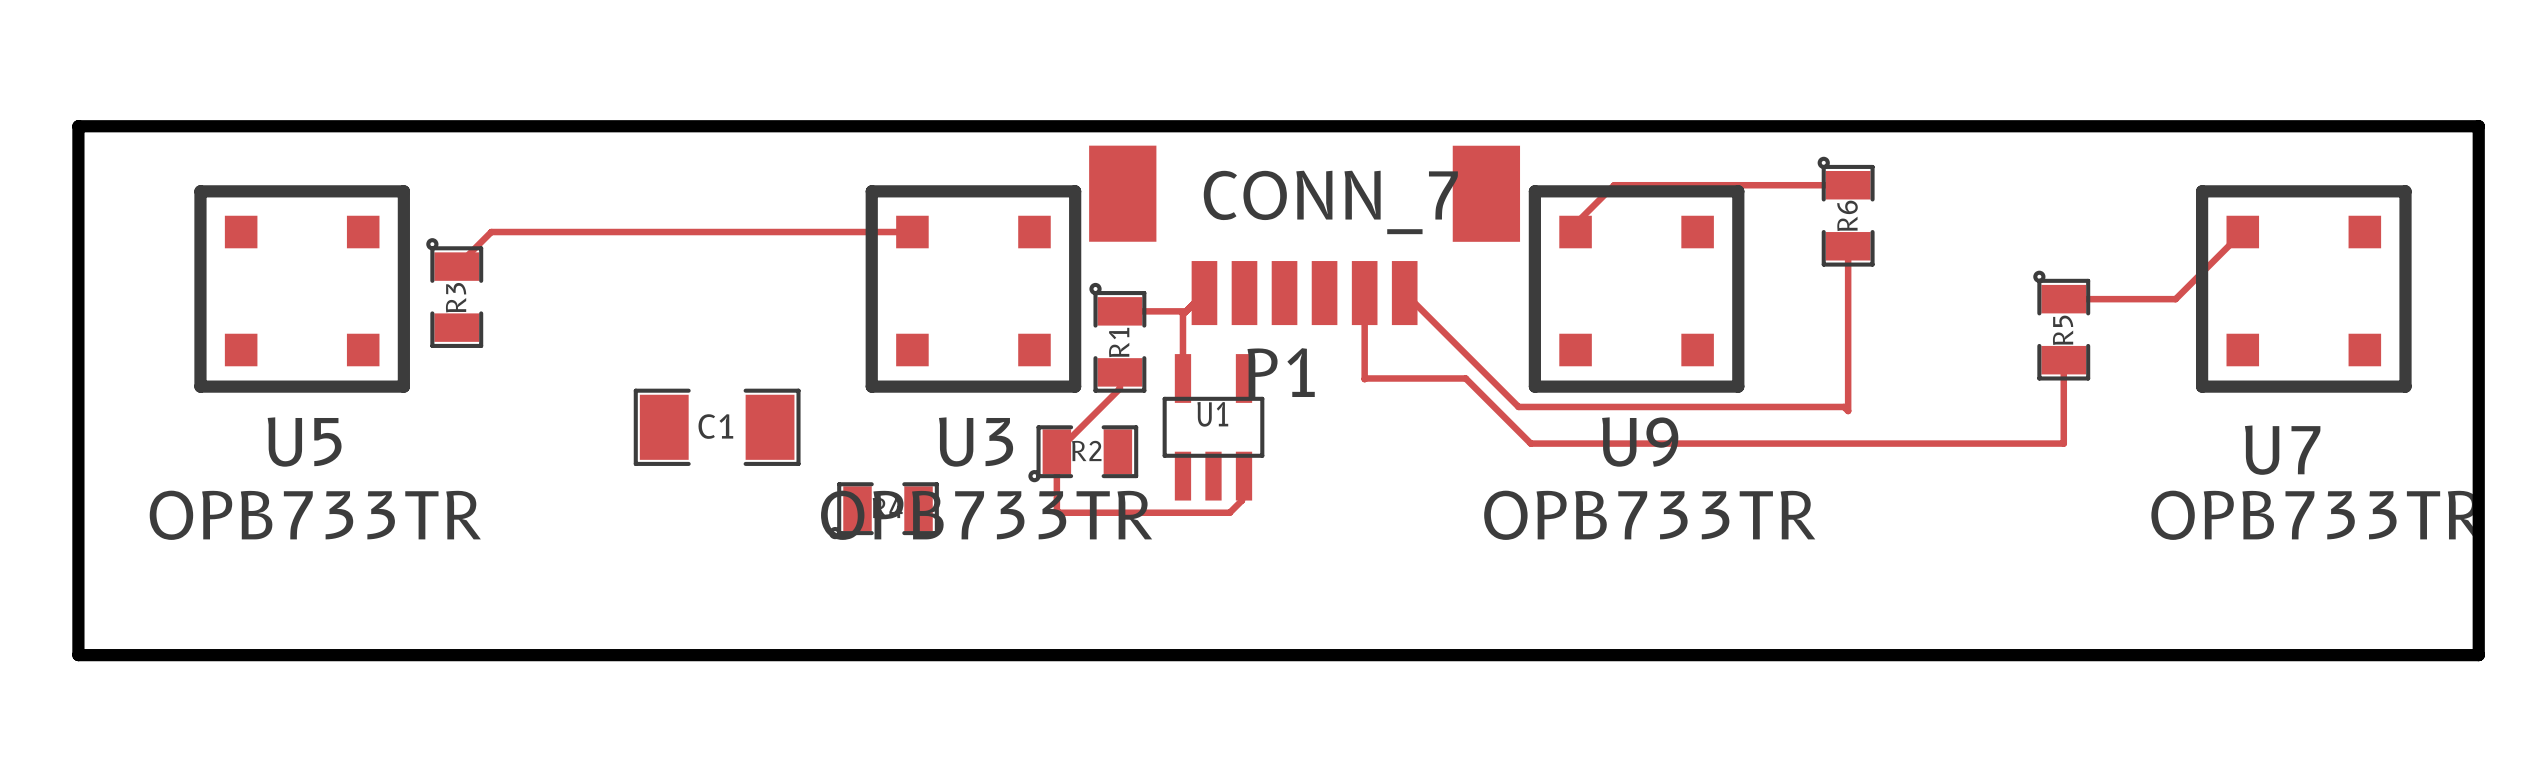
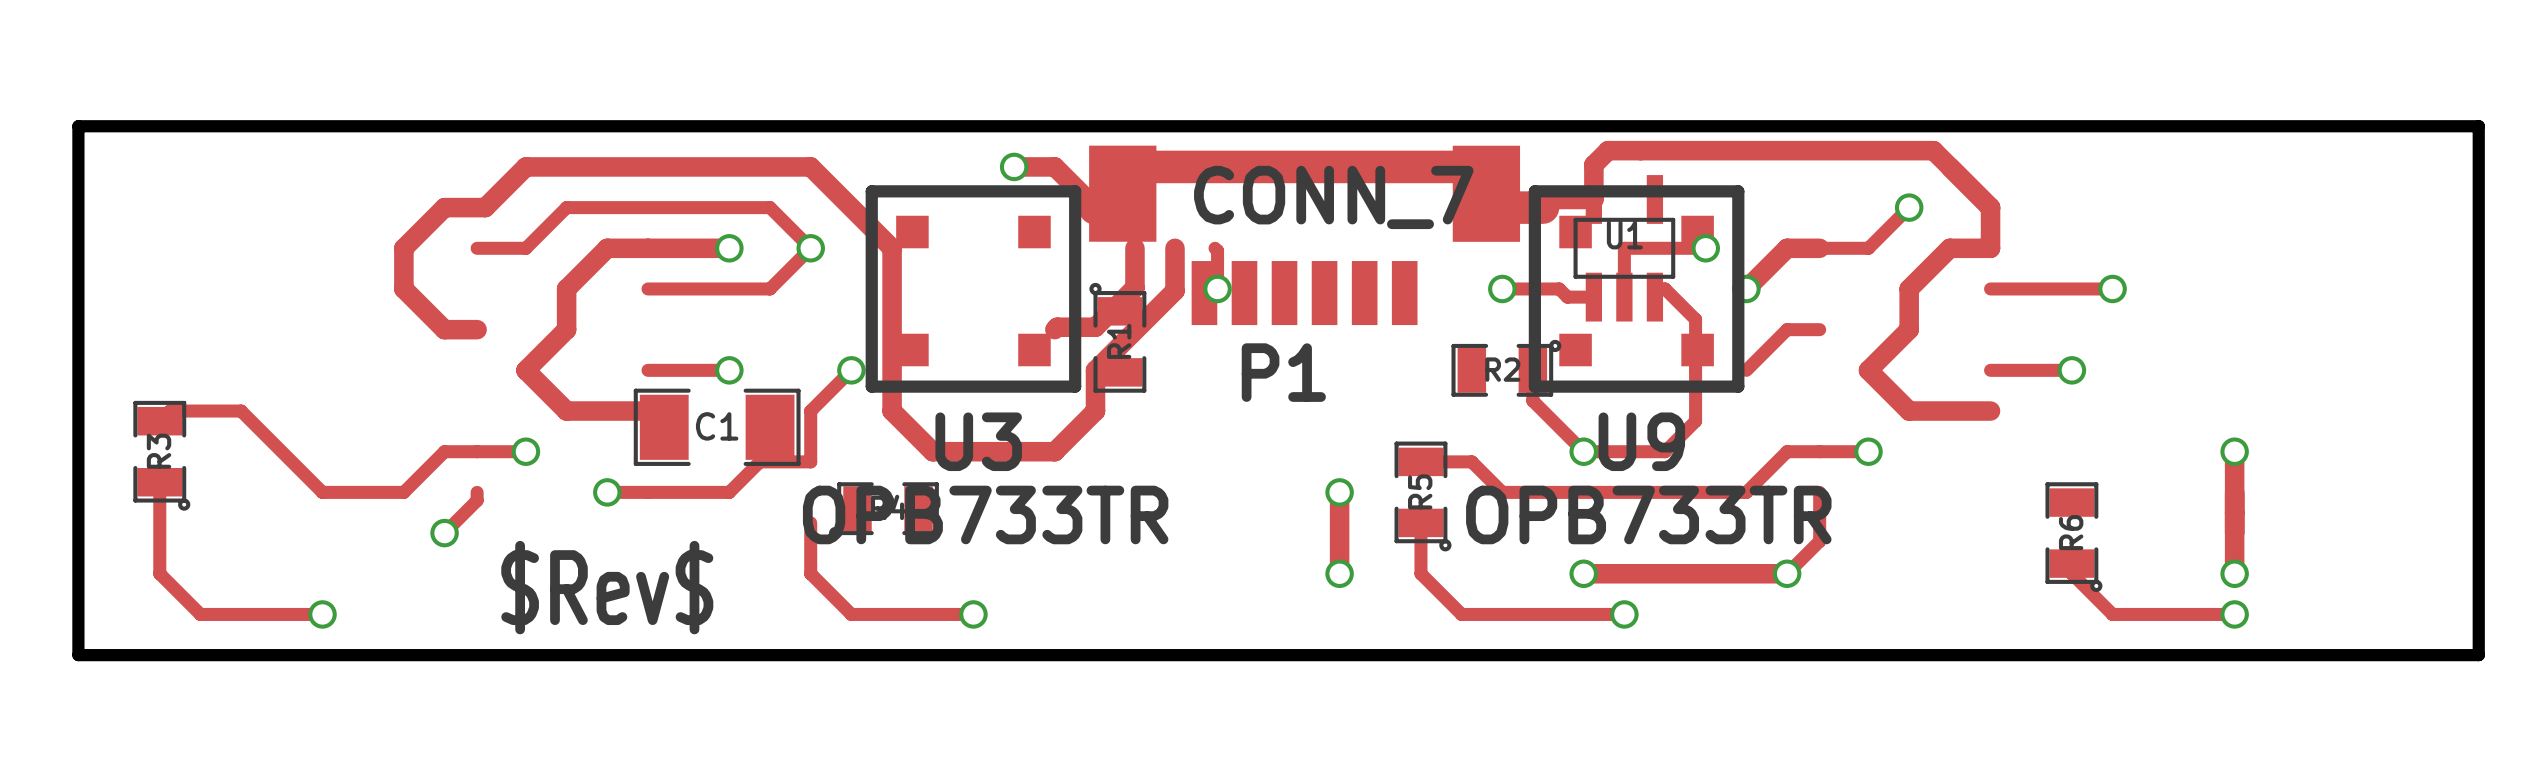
track: none -> (1014, 166) (1054, 166) (1094, 208) (1136, 166) (1461, 166) (1502, 207) (1543, 207) (1551, 199) (1593, 199) (1593, 164) (1608, 150) (1933, 150) (1990, 207) (1990, 248) (1949, 248) (1909, 288) (1909, 329) (1868, 370) (1909, 411) (1990, 411)
via: none -> (1014, 166)
track: (1848, 185) (1614, 185) (1575, 223) (1575, 232) -> none
track: none -> (1909, 207) (1868, 248) (1787, 248) (1746, 288)
via: none -> (1909, 207)
R6 rotation: 0° (1846, 211) -> 180° (2073, 537)
R6 position: (1846, 211) -> (2073, 537)
track: (912, 232) (491, 232) (456, 266) -> none
track: (2242, 232) (2175, 299) (2063, 299) -> none
track: (1848, 246) (1848, 411) (1844, 406) (1518, 406) (1404, 293) -> none
track: none -> (477, 248) (525, 248) (566, 207) (770, 207) (810, 248) (770, 288) (647, 288)
track: none -> (729, 248) (607, 248) (566, 288) (566, 329) (525, 370) (566, 411) (647, 411)
via: none -> (729, 248)
via: none -> (810, 248)
track: none -> (1134, 248) (1134, 287) (1095, 327) (1057, 327) (1054, 329)
track: none -> (1175, 248) (1175, 290) (1095, 370) (1095, 411) (1054, 451) (932, 451) (892, 411) (892, 248) (810, 166) (525, 166) (485, 207) (444, 207) (403, 248) (403, 288) (444, 329) (477, 329)
track: none -> (1215, 248) (1217, 250) (1217, 288)
track: none -> (1705, 248) (1624, 248) (1624, 297)
via: none -> (1705, 248)
U5: OPB733TR (302, 288) -> none
via: none -> (1217, 288)
track: none -> (1502, 288) (1559, 288) (1567, 297) (1593, 297) (1593, 288)
via: none -> (1502, 288)
via: none -> (1746, 288)
track: none -> (1990, 288) (2112, 288)
via: none -> (2112, 288)
U7: OPB733TR (2303, 288) -> none
R3 rotation: 0° (454, 293) -> 180° (161, 455)
R3 position: (454, 293) -> (161, 455)
track: (1204, 293) (1182, 314) (1182, 378) -> none
track: (1364, 293) (1364, 379) (1465, 378) (1530, 443) (2063, 443) (2063, 360) -> none
track: none -> (1654, 297) (1654, 288) (1665, 288) (1695, 319) (1695, 421) (1665, 451) (1583, 451) (1532, 400) (1532, 370)
track: (1119, 311) (1186, 311) -> none
R5 rotation: 0° (2061, 325) -> 180° (1423, 496)
R5 position: (2061, 325) -> (1423, 496)
track: none -> (1819, 329) (1787, 329) (1746, 370)
track: none -> (647, 370) (729, 370)
via: none -> (729, 370)
track: none -> (851, 370) (810, 411) (810, 461) (759, 461) (729, 492) (607, 492)
via: none -> (851, 370)
track: none -> (1990, 370) (2071, 370)
via: none -> (2071, 370)
track: (1119, 372) (1119, 388) (1056, 451) (1056, 510) (1058, 512) (1229, 512) (1241, 500) (1244, 476) -> none
track: none -> (159, 421) (169, 411) (241, 411) (322, 492) (403, 492) (444, 451) (525, 451)
U1 position: (1213, 427) -> (1624, 248)
via: none -> (525, 451)
via: none -> (1583, 451)
track: none -> (1868, 451) (1787, 451) (1746, 492) (1502, 492) (1471, 461) (1420, 461)
via: none -> (1868, 451)
track: none -> (2234, 451) (2234, 573)
via: none -> (2234, 451)
R2 rotation: 0° (1083, 453) -> 180° (1506, 368)
R2 position: (1083, 453) -> (1506, 368)
track: none -> (159, 482) (159, 573) (200, 614) (322, 614)
track: none -> (477, 492) (477, 500) (444, 533)
via: none -> (607, 492)
track: none -> (1339, 492) (1339, 573)
via: none -> (1339, 492)
track: none -> (1819, 492) (1819, 541) (1787, 573) (1583, 573)
track: none -> (810, 522) (810, 573) (851, 614) (973, 614)
track: none -> (1420, 522) (1420, 573) (1461, 614) (1624, 614)
via: none -> (444, 533)
track: none -> (2071, 563) (2071, 573) (2112, 614) (2234, 614)
via: none -> (1339, 573)
via: none -> (1583, 573)
via: none -> (1787, 573)
via: none -> (2234, 573)
text: none -> $Rev$ (607, 587)
via: none -> (322, 614)
via: none -> (973, 614)
via: none -> (1624, 614)
via: none -> (2234, 614)

